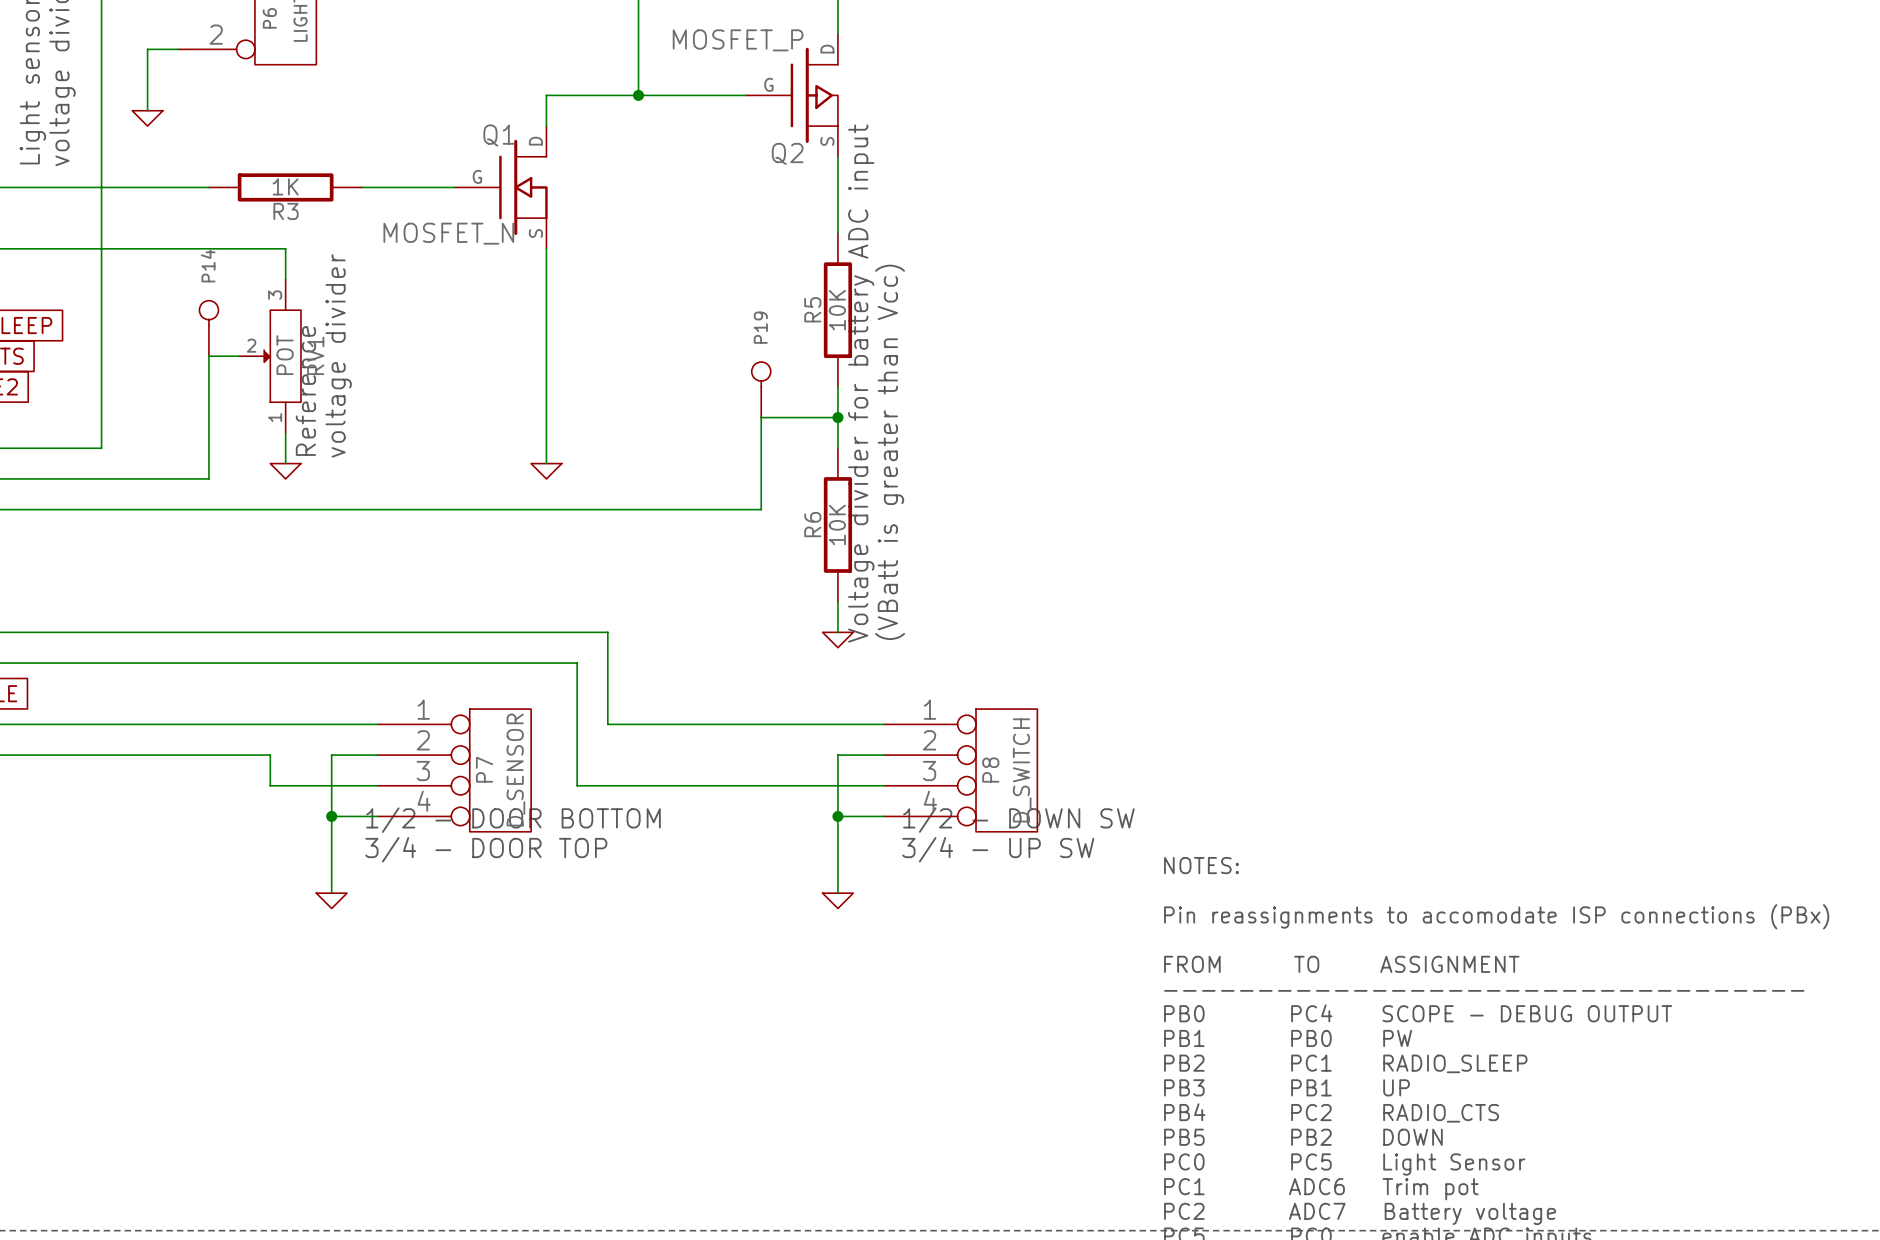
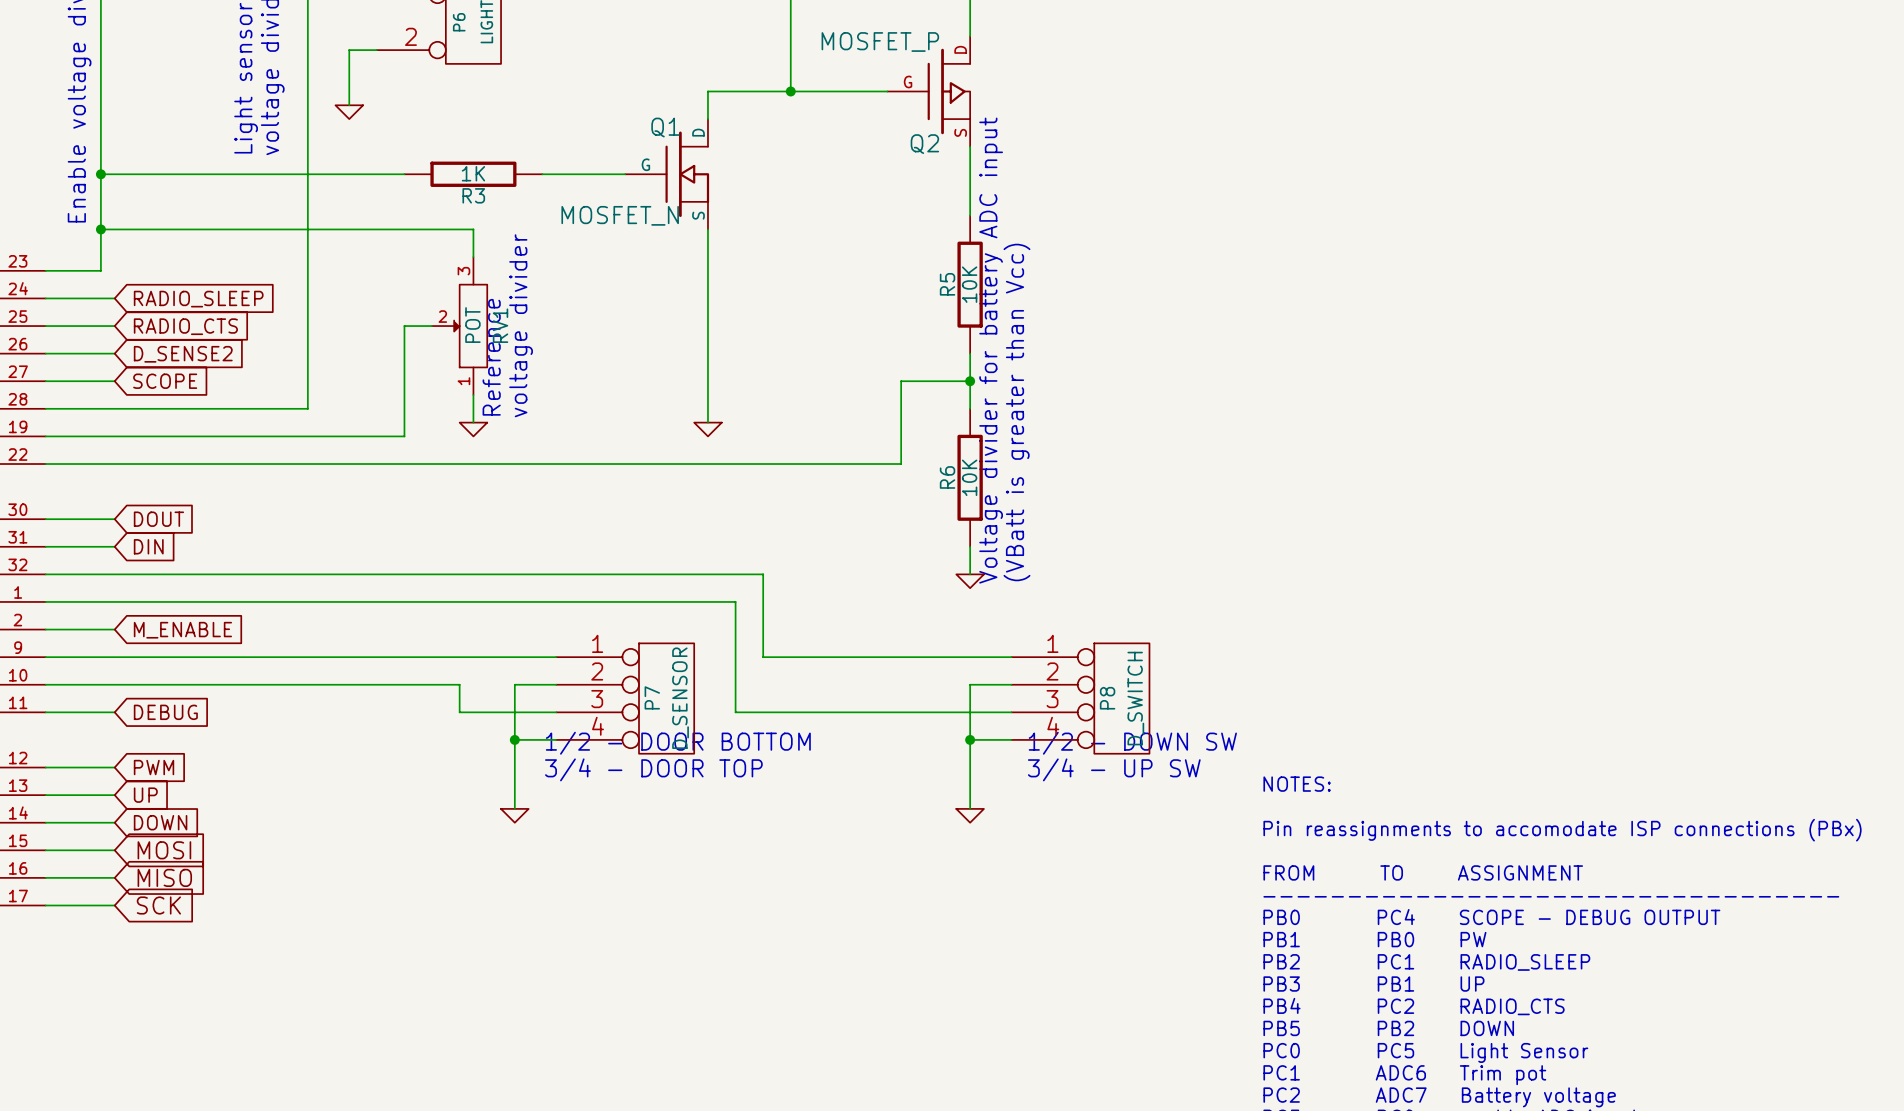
P14: (208, 328) -> none
P19: (761, 389) -> none

